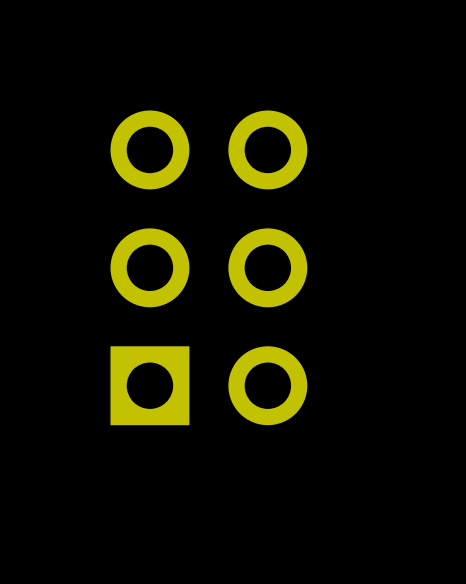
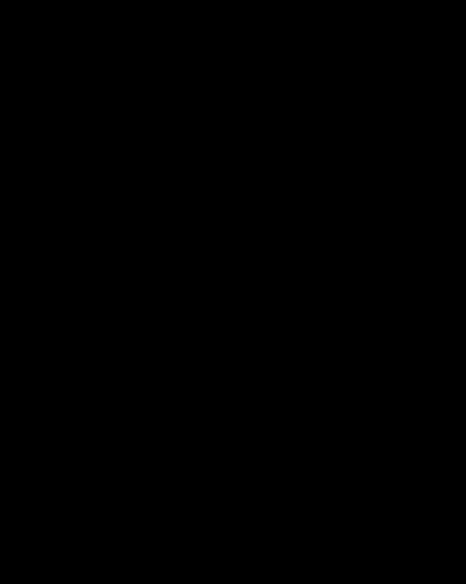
part: (208, 267) -> none

